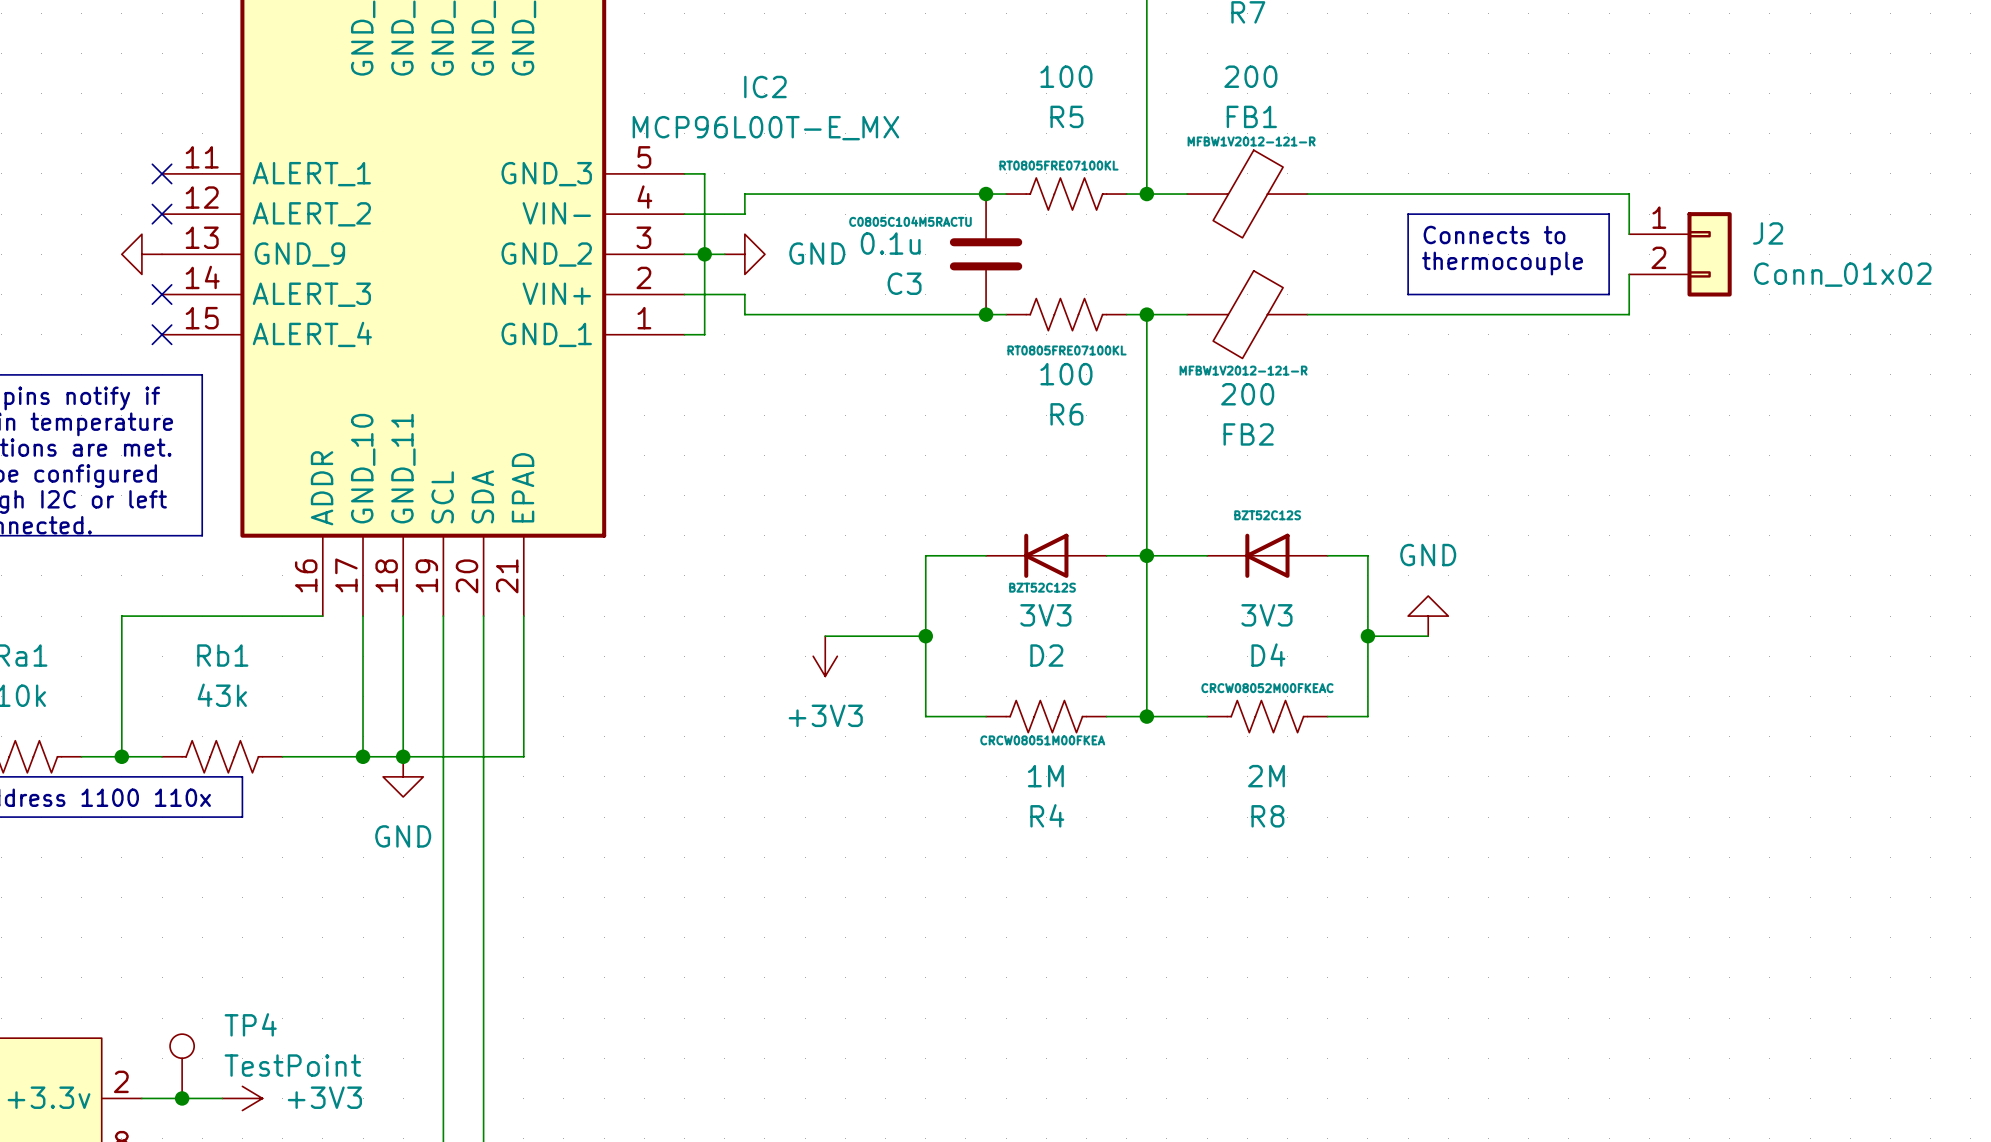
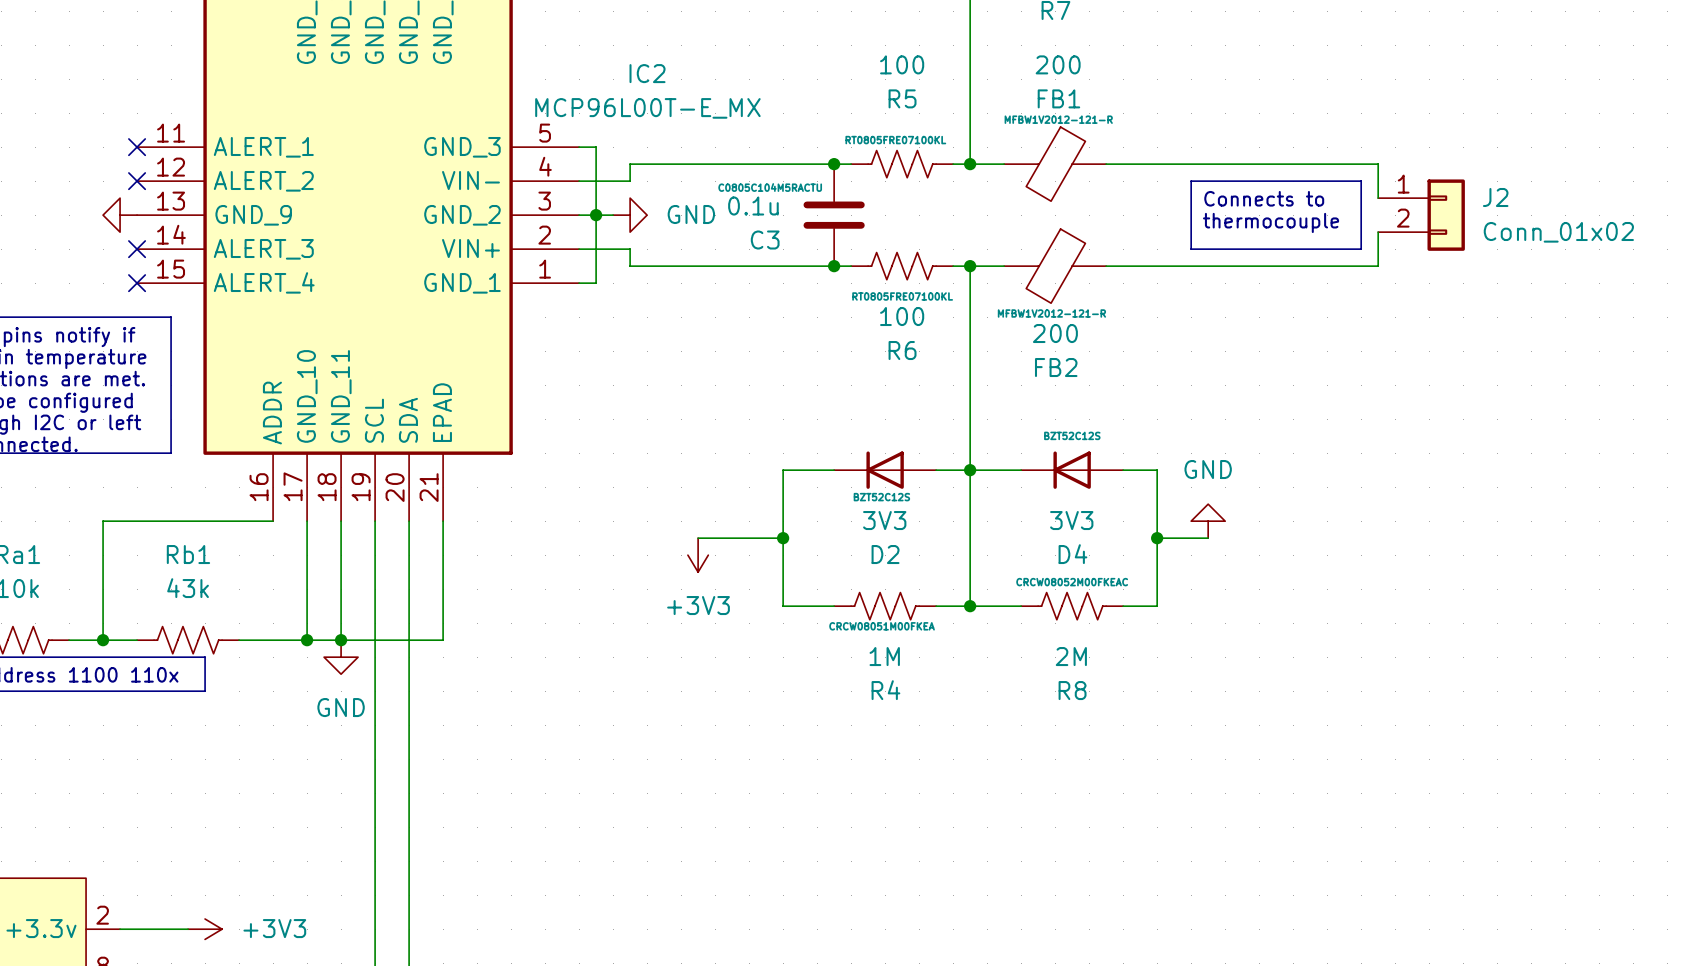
TP4: TestPoint (182, 1066) -> none
junction: (182, 1098) -> none

